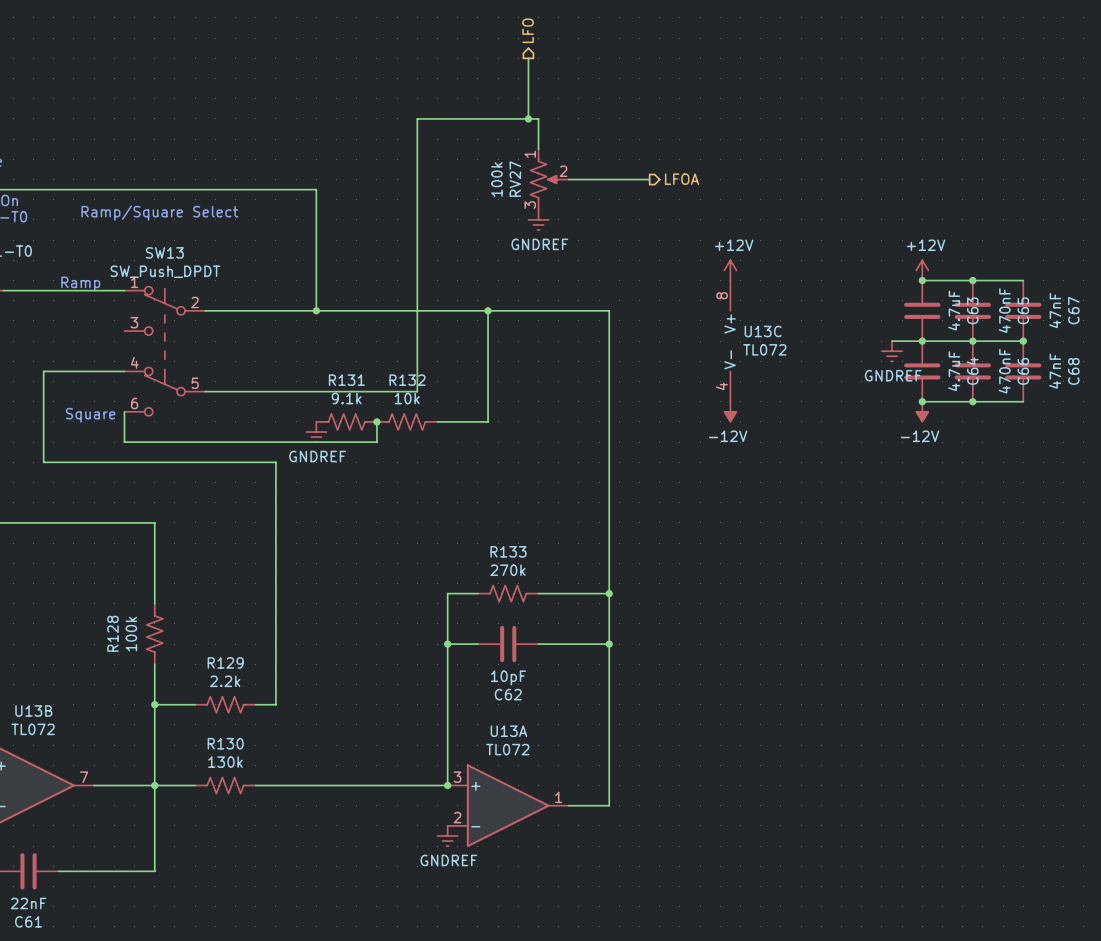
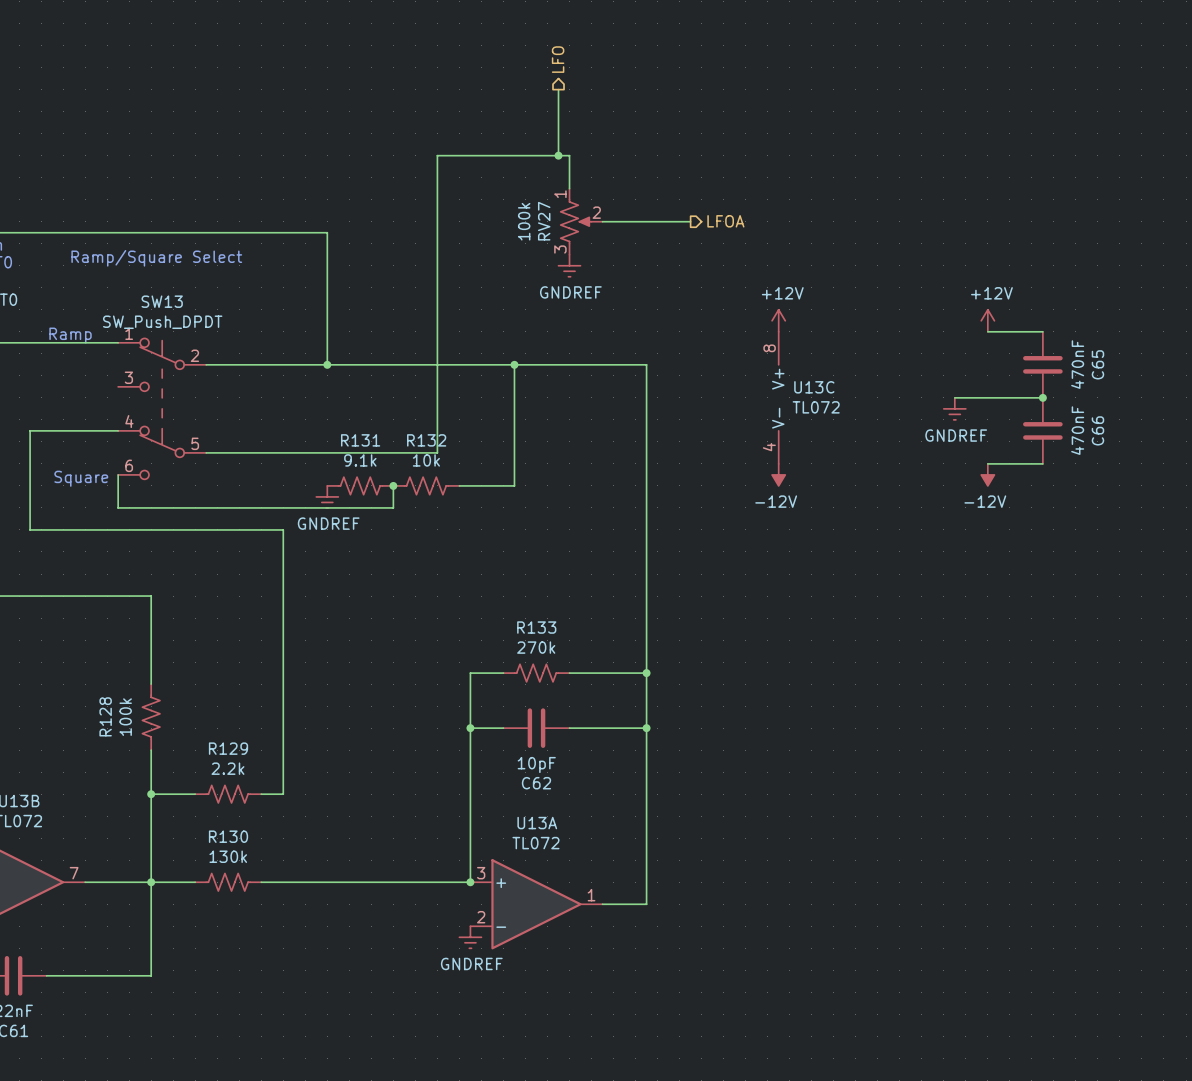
junction: (922, 280) -> none
wire: (972, 280) (1023, 280) -> none
junction: (972, 280) -> none
C63: 4.7uF (922, 310) -> none
C67: 47nF (1023, 310) -> none
junction: (922, 341) -> none
wire: (972, 341) (1023, 341) -> none
junction: (1023, 341) -> none
C64: 4.7uF (922, 371) -> none
C68: 47nF (1023, 371) -> none
junction: (922, 401) -> none
wire: (972, 401) (1023, 401) -> none
junction: (972, 401) -> none

